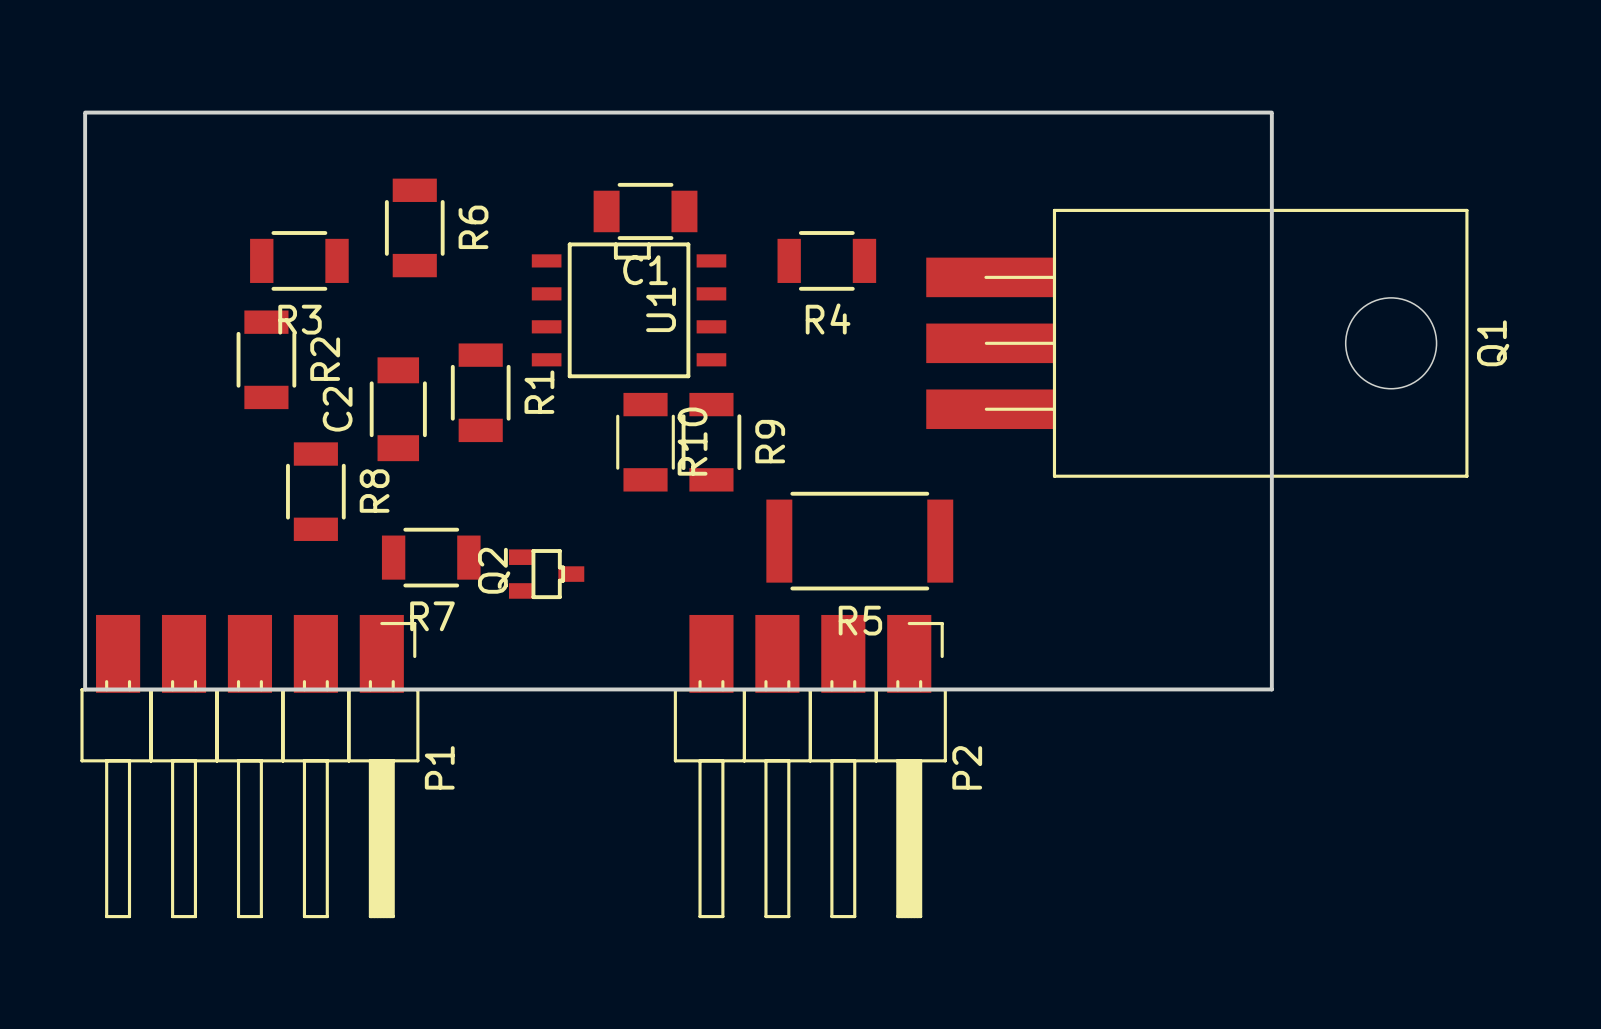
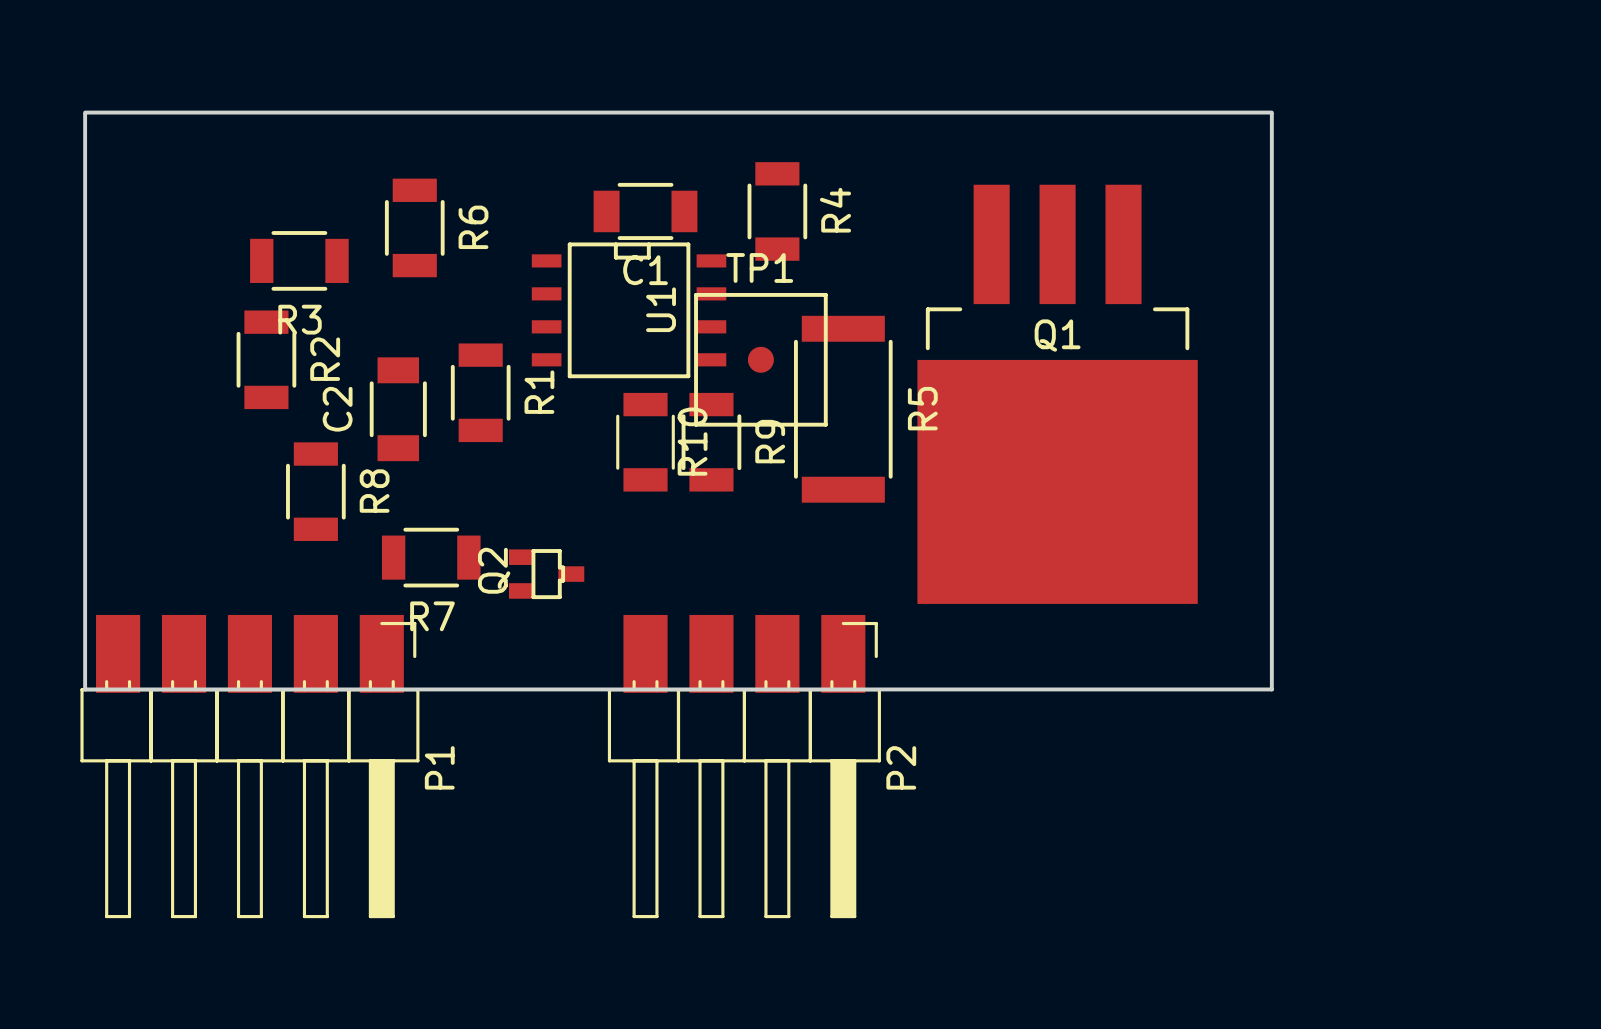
Q1 footprint: [926, 208, 1469, 478] -> [917, 184, 1198, 604]
R4 rotation: 0° (826, 260) -> 90° clockwise (777, 211)
R4 position: (826, 260) -> (777, 211)
R4 name position: R4 (828, 319) -> R4 (835, 210)
Q1 name position: Q1 (1493, 343) -> Q1 (1057, 335)
TP1: none -> (760, 359)
R5 rotation: 0° (859, 541) -> 90° clockwise (843, 409)
R5 position: (859, 541) -> (843, 409)
R5 name position: R5 (860, 620) -> R5 (922, 408)
P2 position: (810, 766) -> (744, 766)

